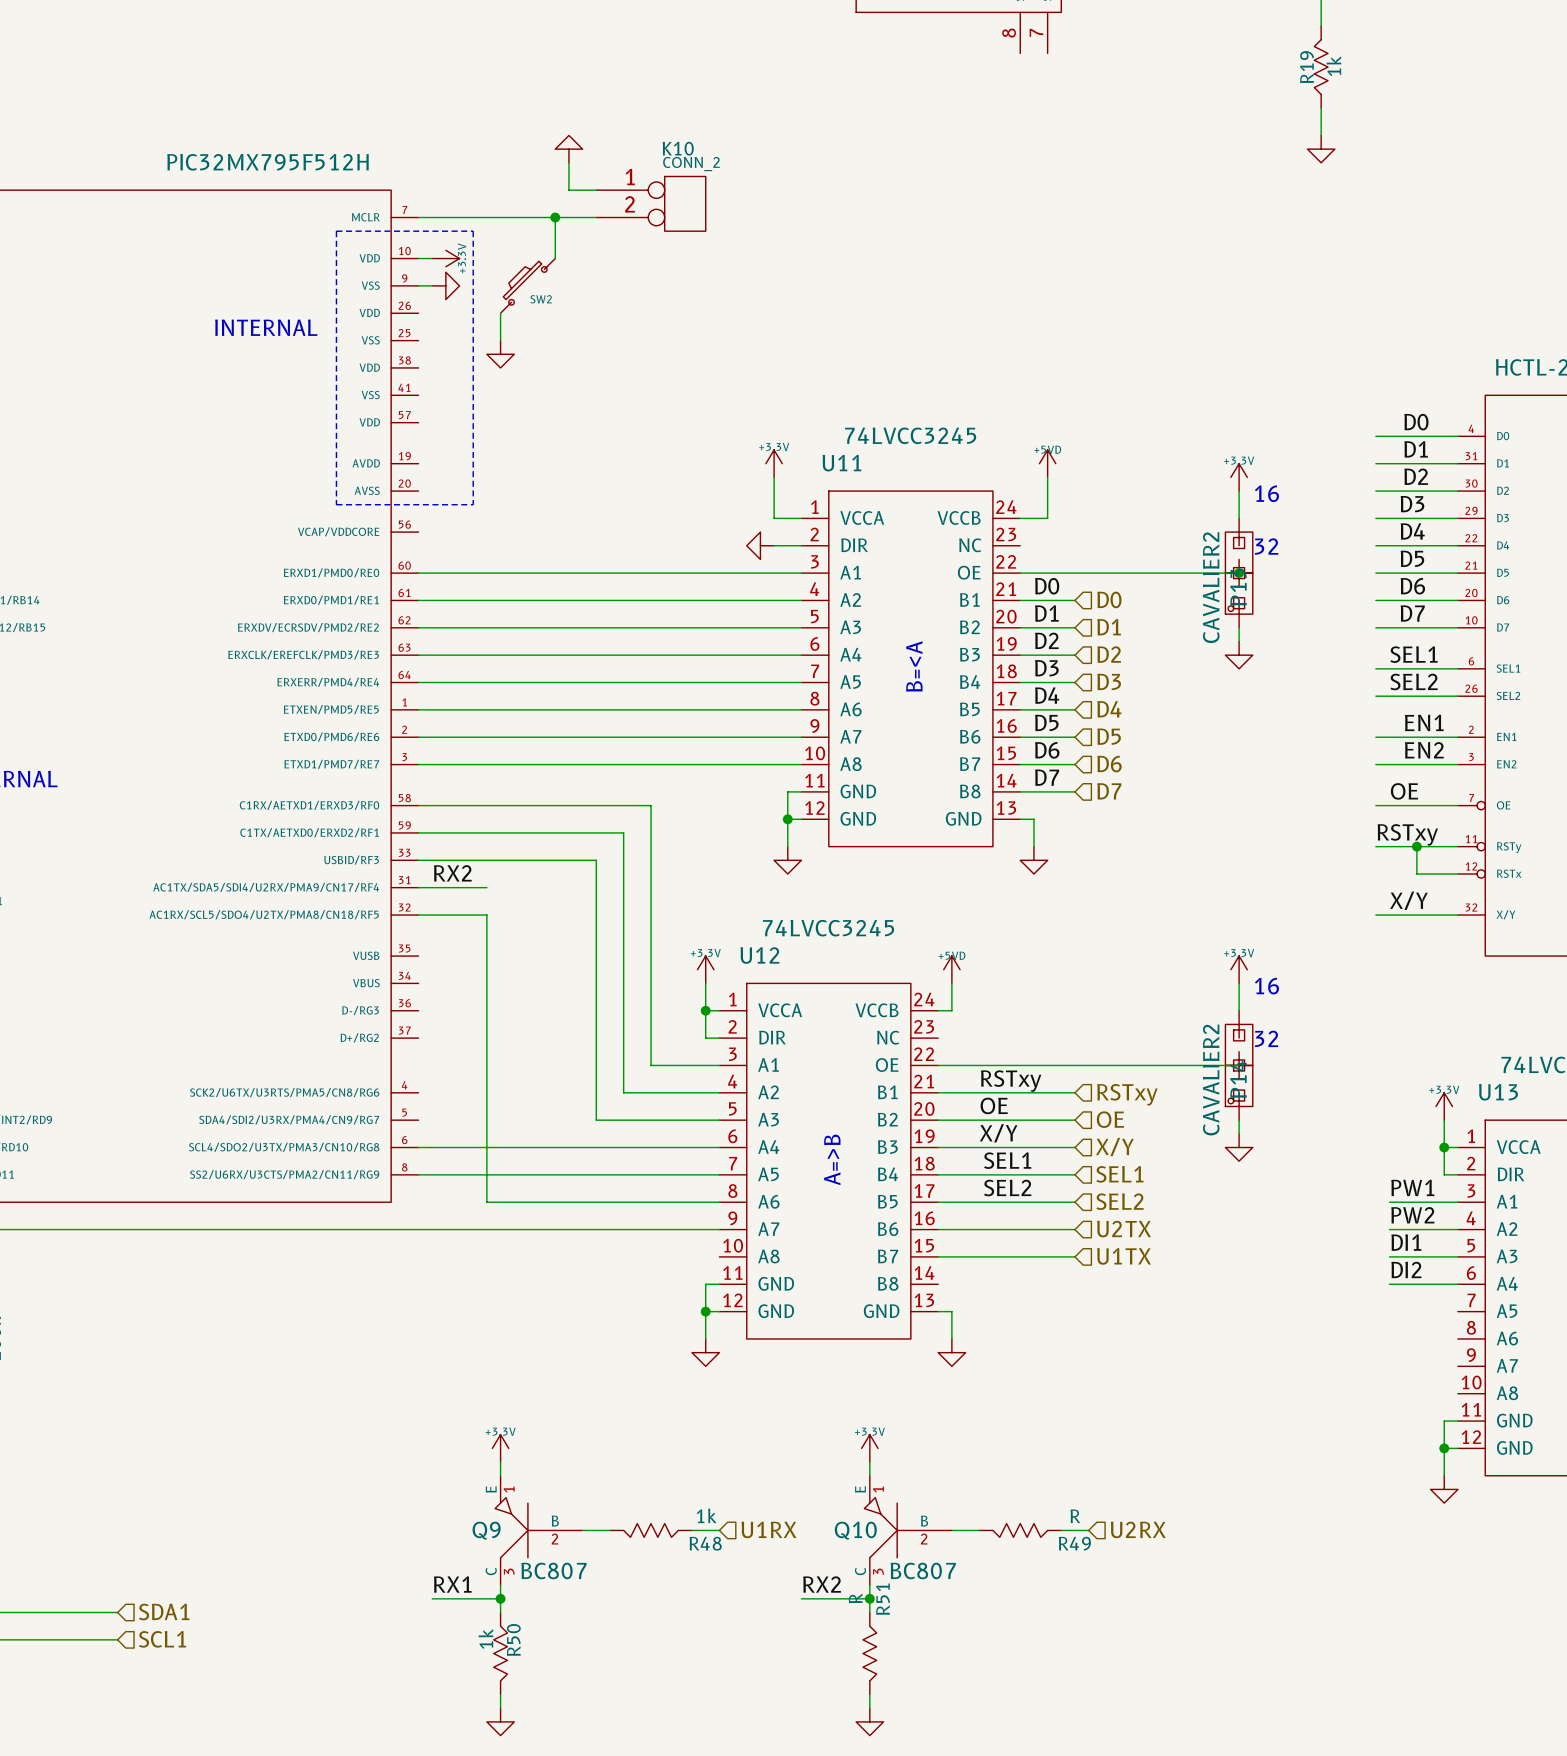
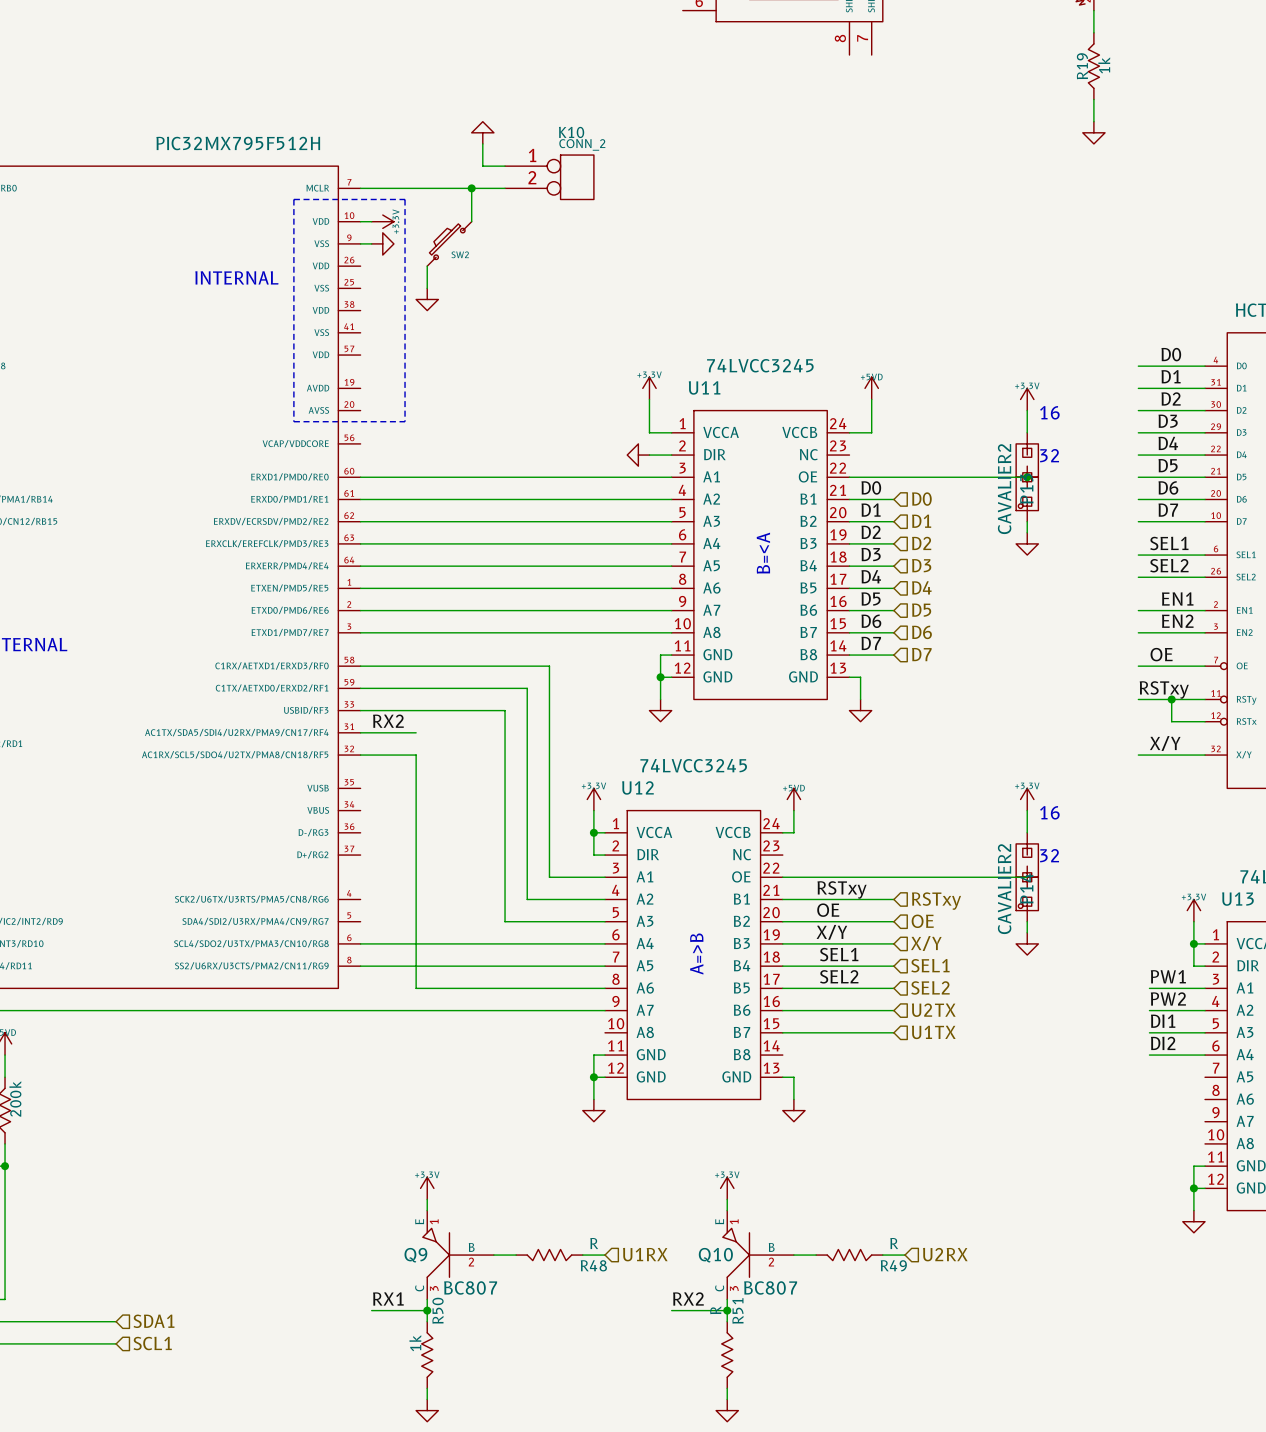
R48 value: 1k (706, 1515) -> R (594, 1243)
R50 name position: R50 (513, 1640) -> R50 (438, 1310)

